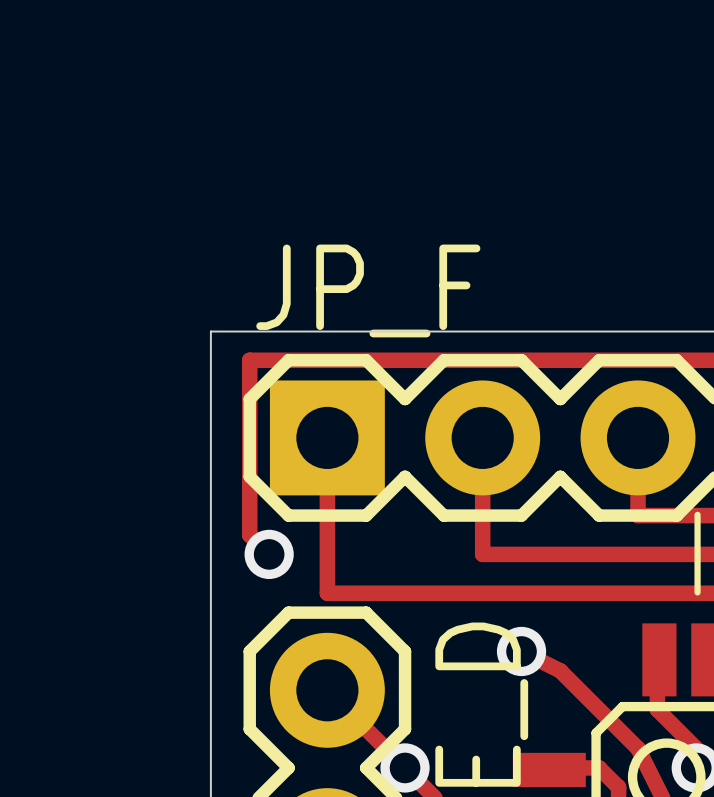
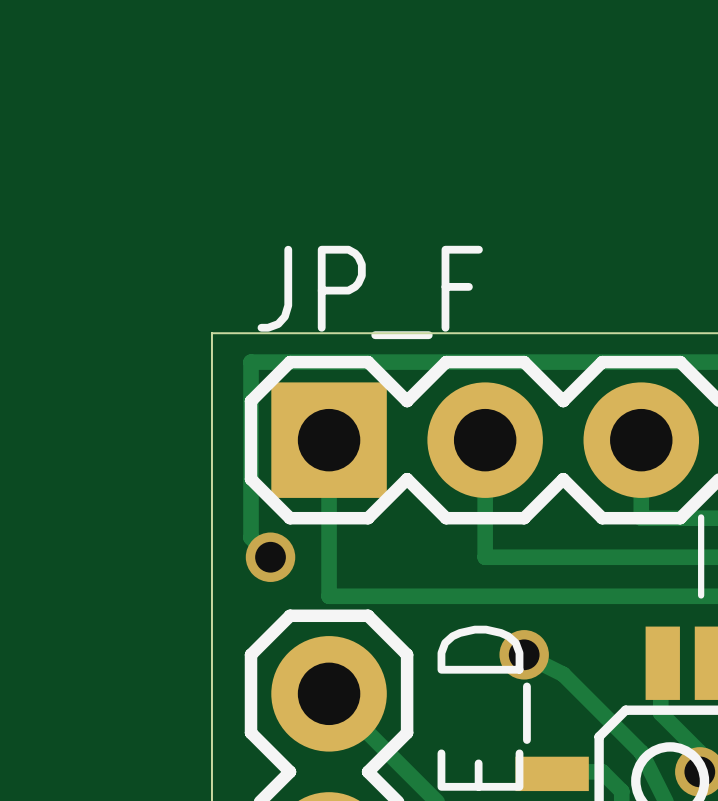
via: (405, 767) -> none

